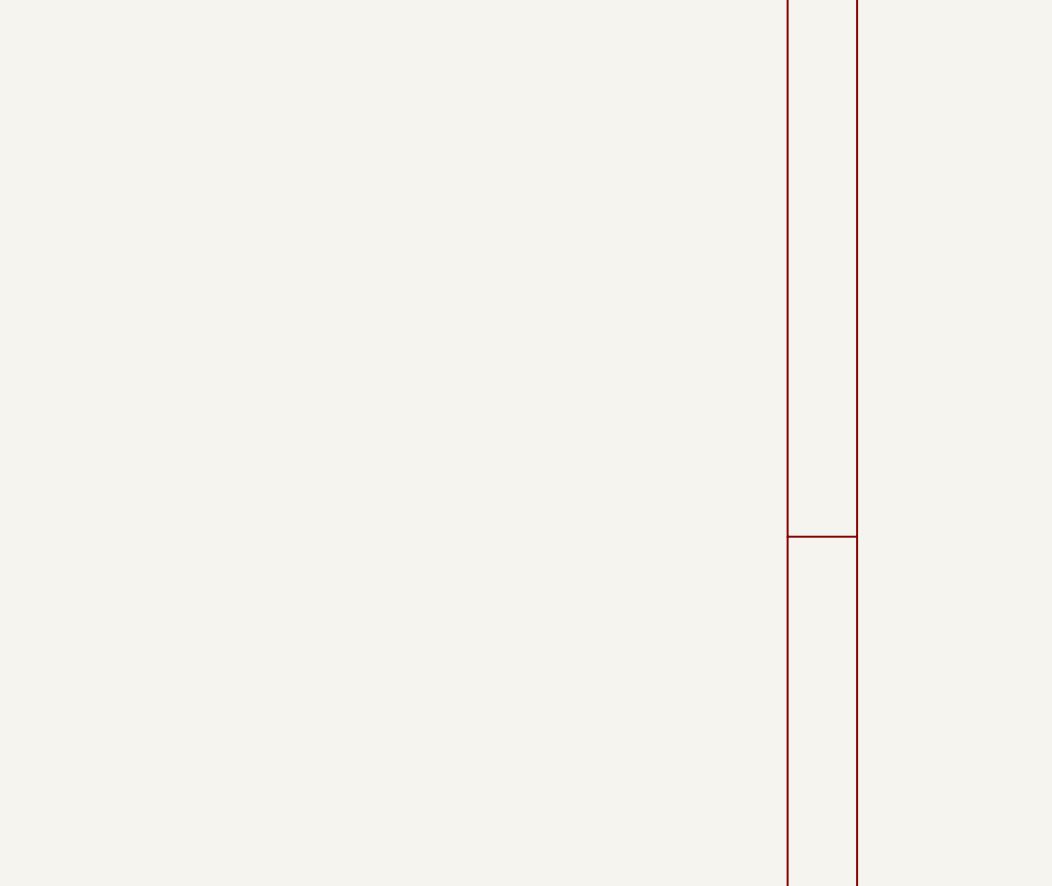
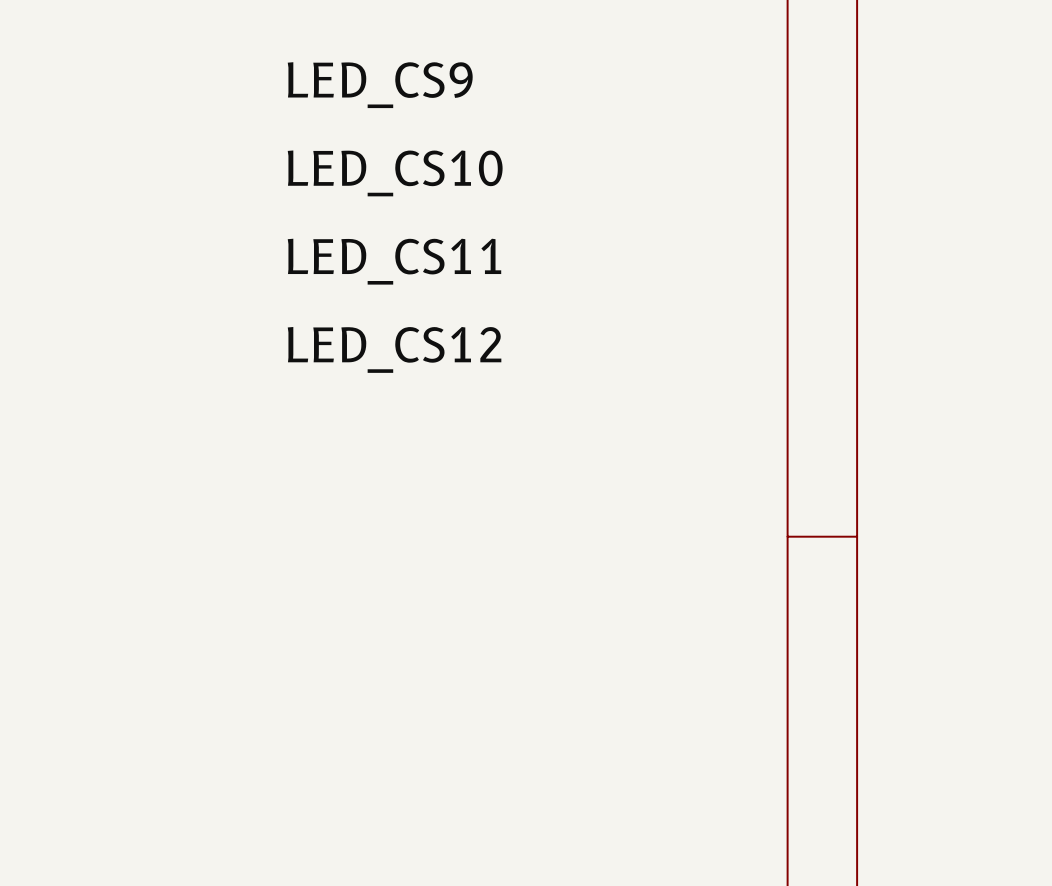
label: none -> LED_CS9 (380, 85)
label: none -> LED_CS10 (395, 173)
label: none -> LED_CS11 (394, 261)
label: none -> LED_CS12 (394, 349)

